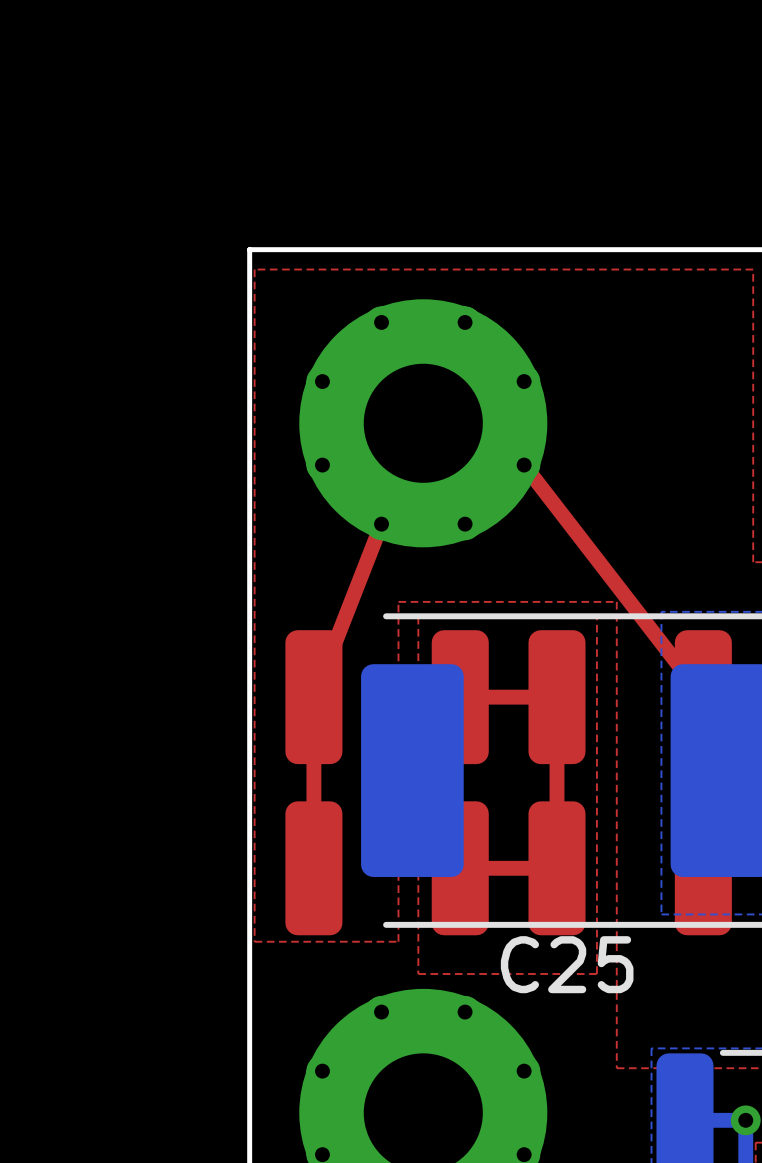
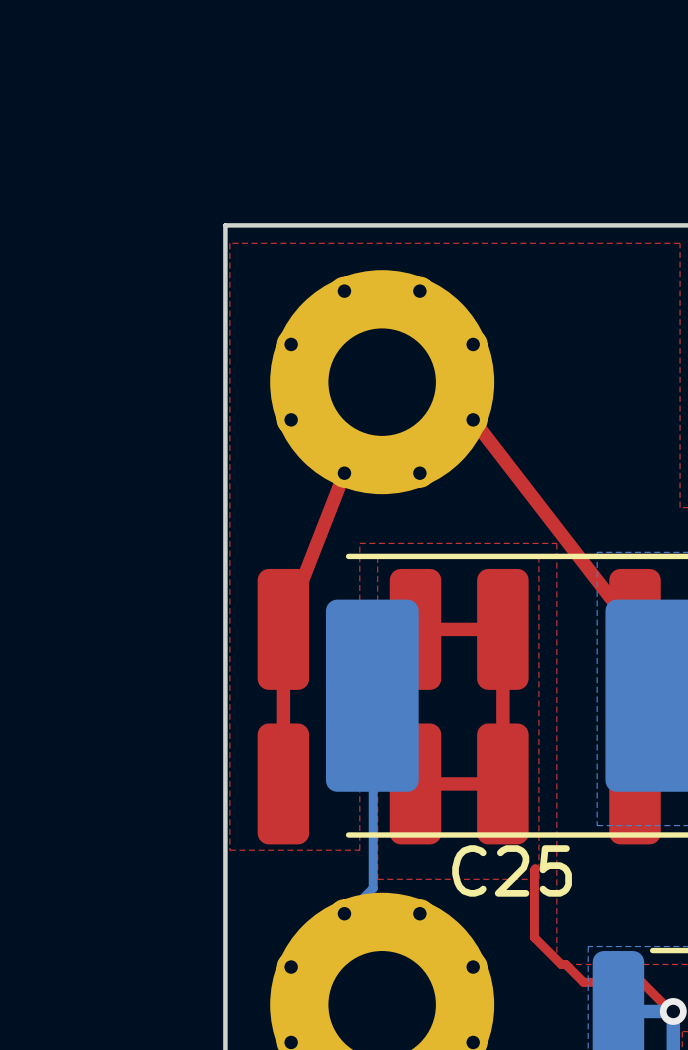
bottom track: none -> (373, 695) (373, 888) (346, 915) (344, 913)
top track: none -> (535, 868) (534, 937) (561, 964) (565, 964) (583, 982) (641, 982) (673, 1013) (673, 1011) (672, 1012)

